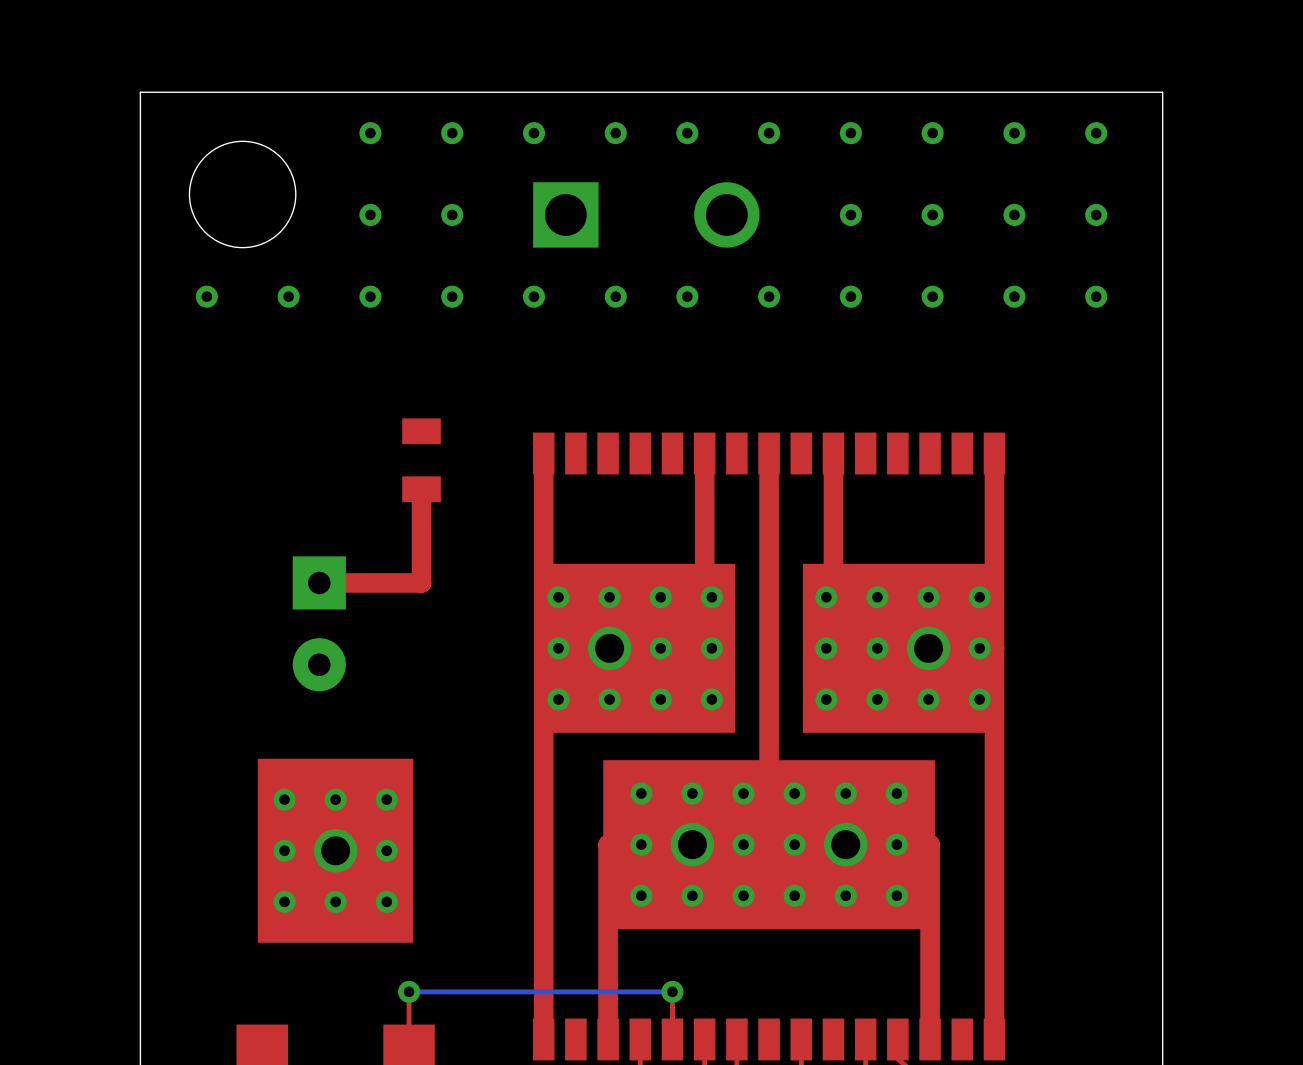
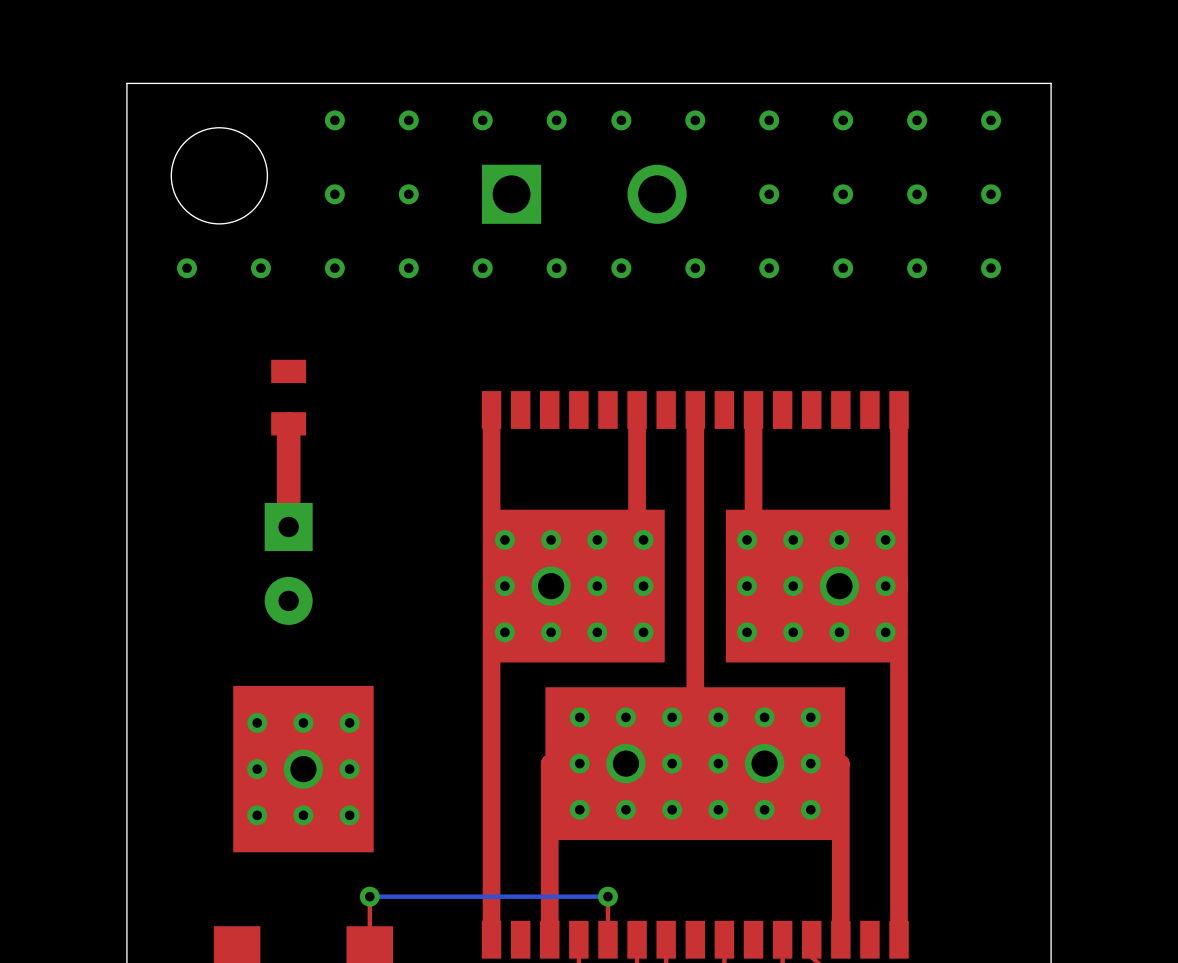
part position: (421, 460) -> (288, 397)
top track: (421, 489) (421, 582) (319, 582) -> (288, 423) (288, 527)

